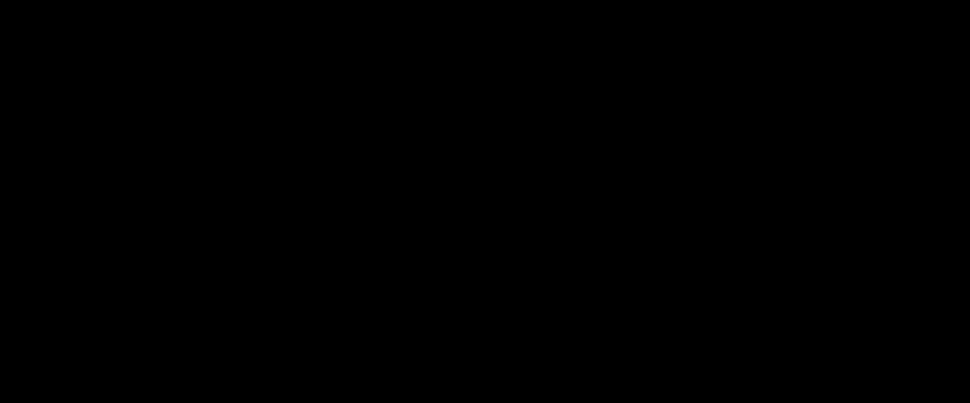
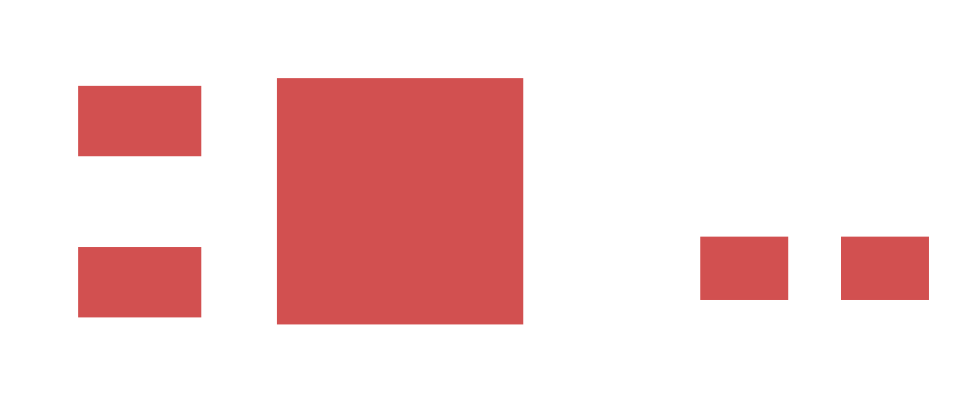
part: none -> (300, 201)
part: none -> (814, 268)

